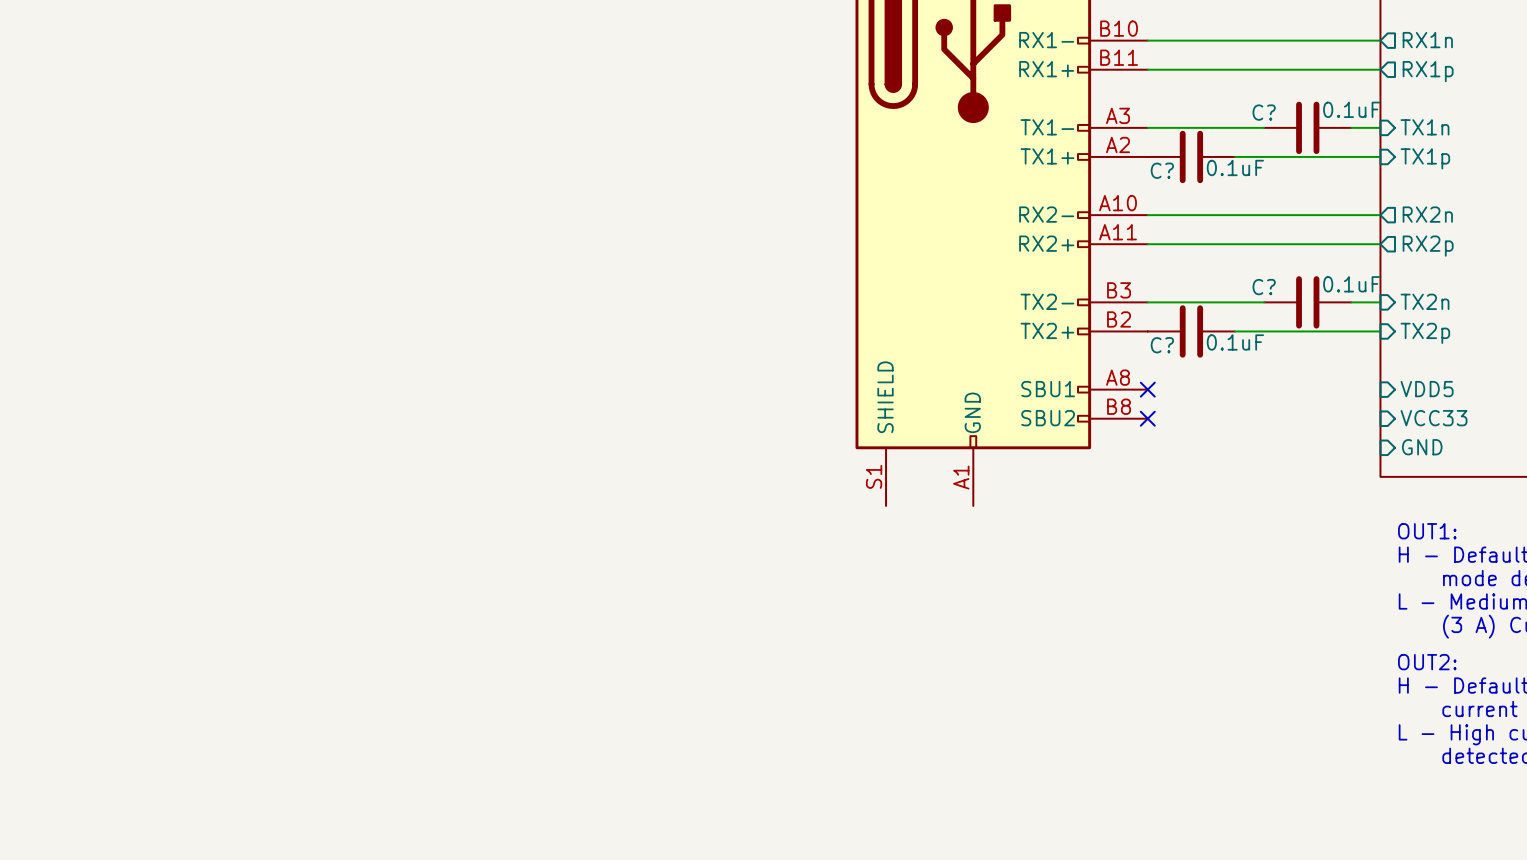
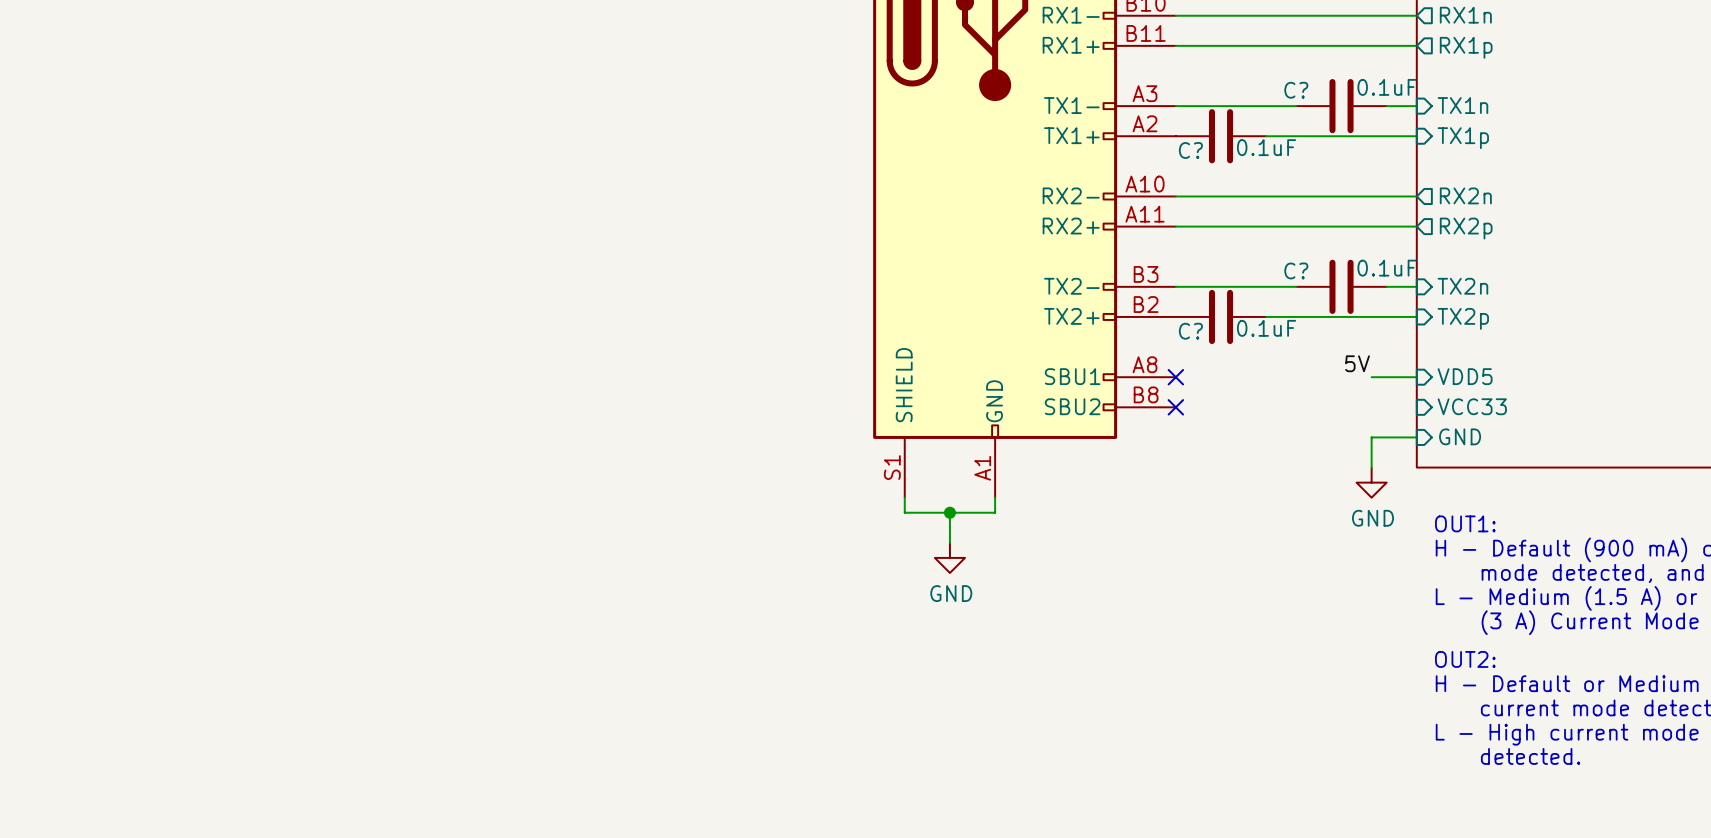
label: none -> 5V (1357, 363)
wire: none -> (1371, 377) (1416, 377)
wire: none -> (1416, 437) (1371, 437) (1371, 467)
power symbol: none -> GND (1371, 482)
wire: none -> (904, 497) (904, 512) (995, 512) (995, 497)
wire: none -> (949, 512) (949, 542)
junction: none -> (949, 512)
power symbol: none -> GND (949, 557)

